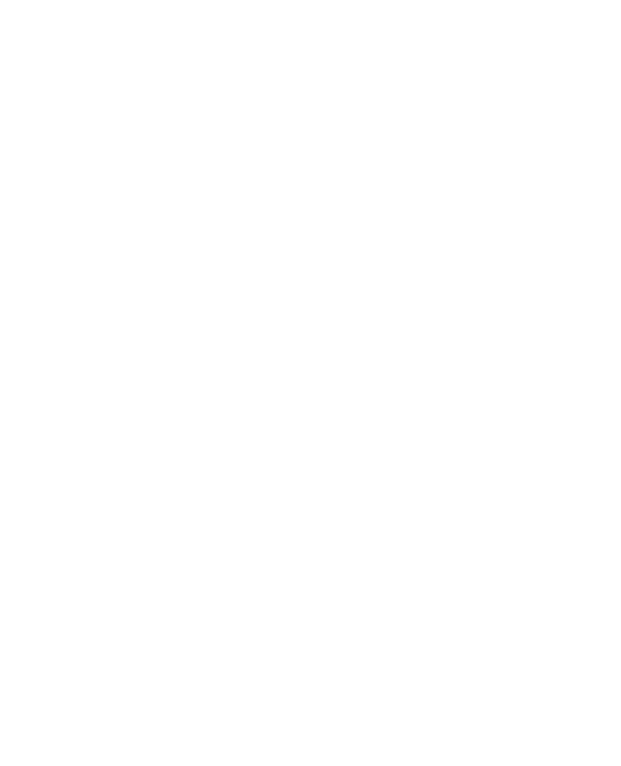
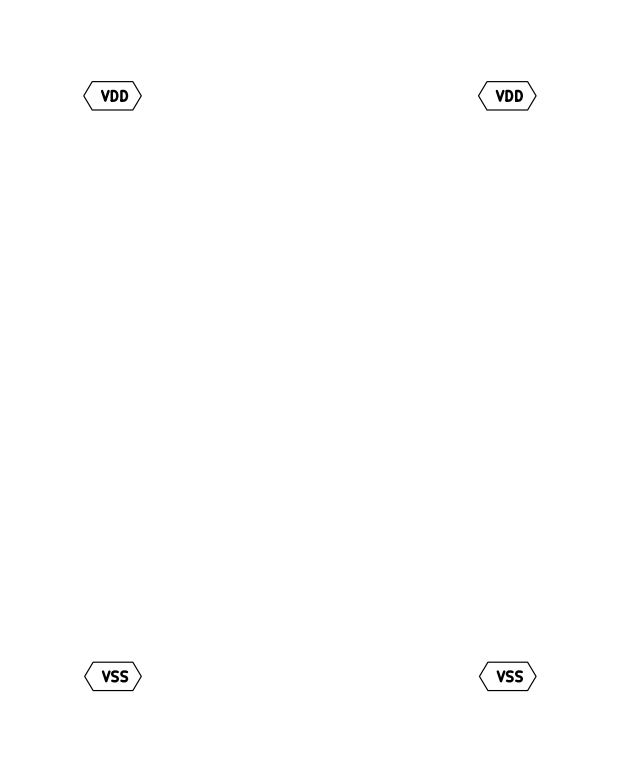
global label: none -> VDD (114, 95)
global label: none -> VDD (509, 95)
global label: none -> VSS (114, 676)
global label: none -> VSS (509, 676)

